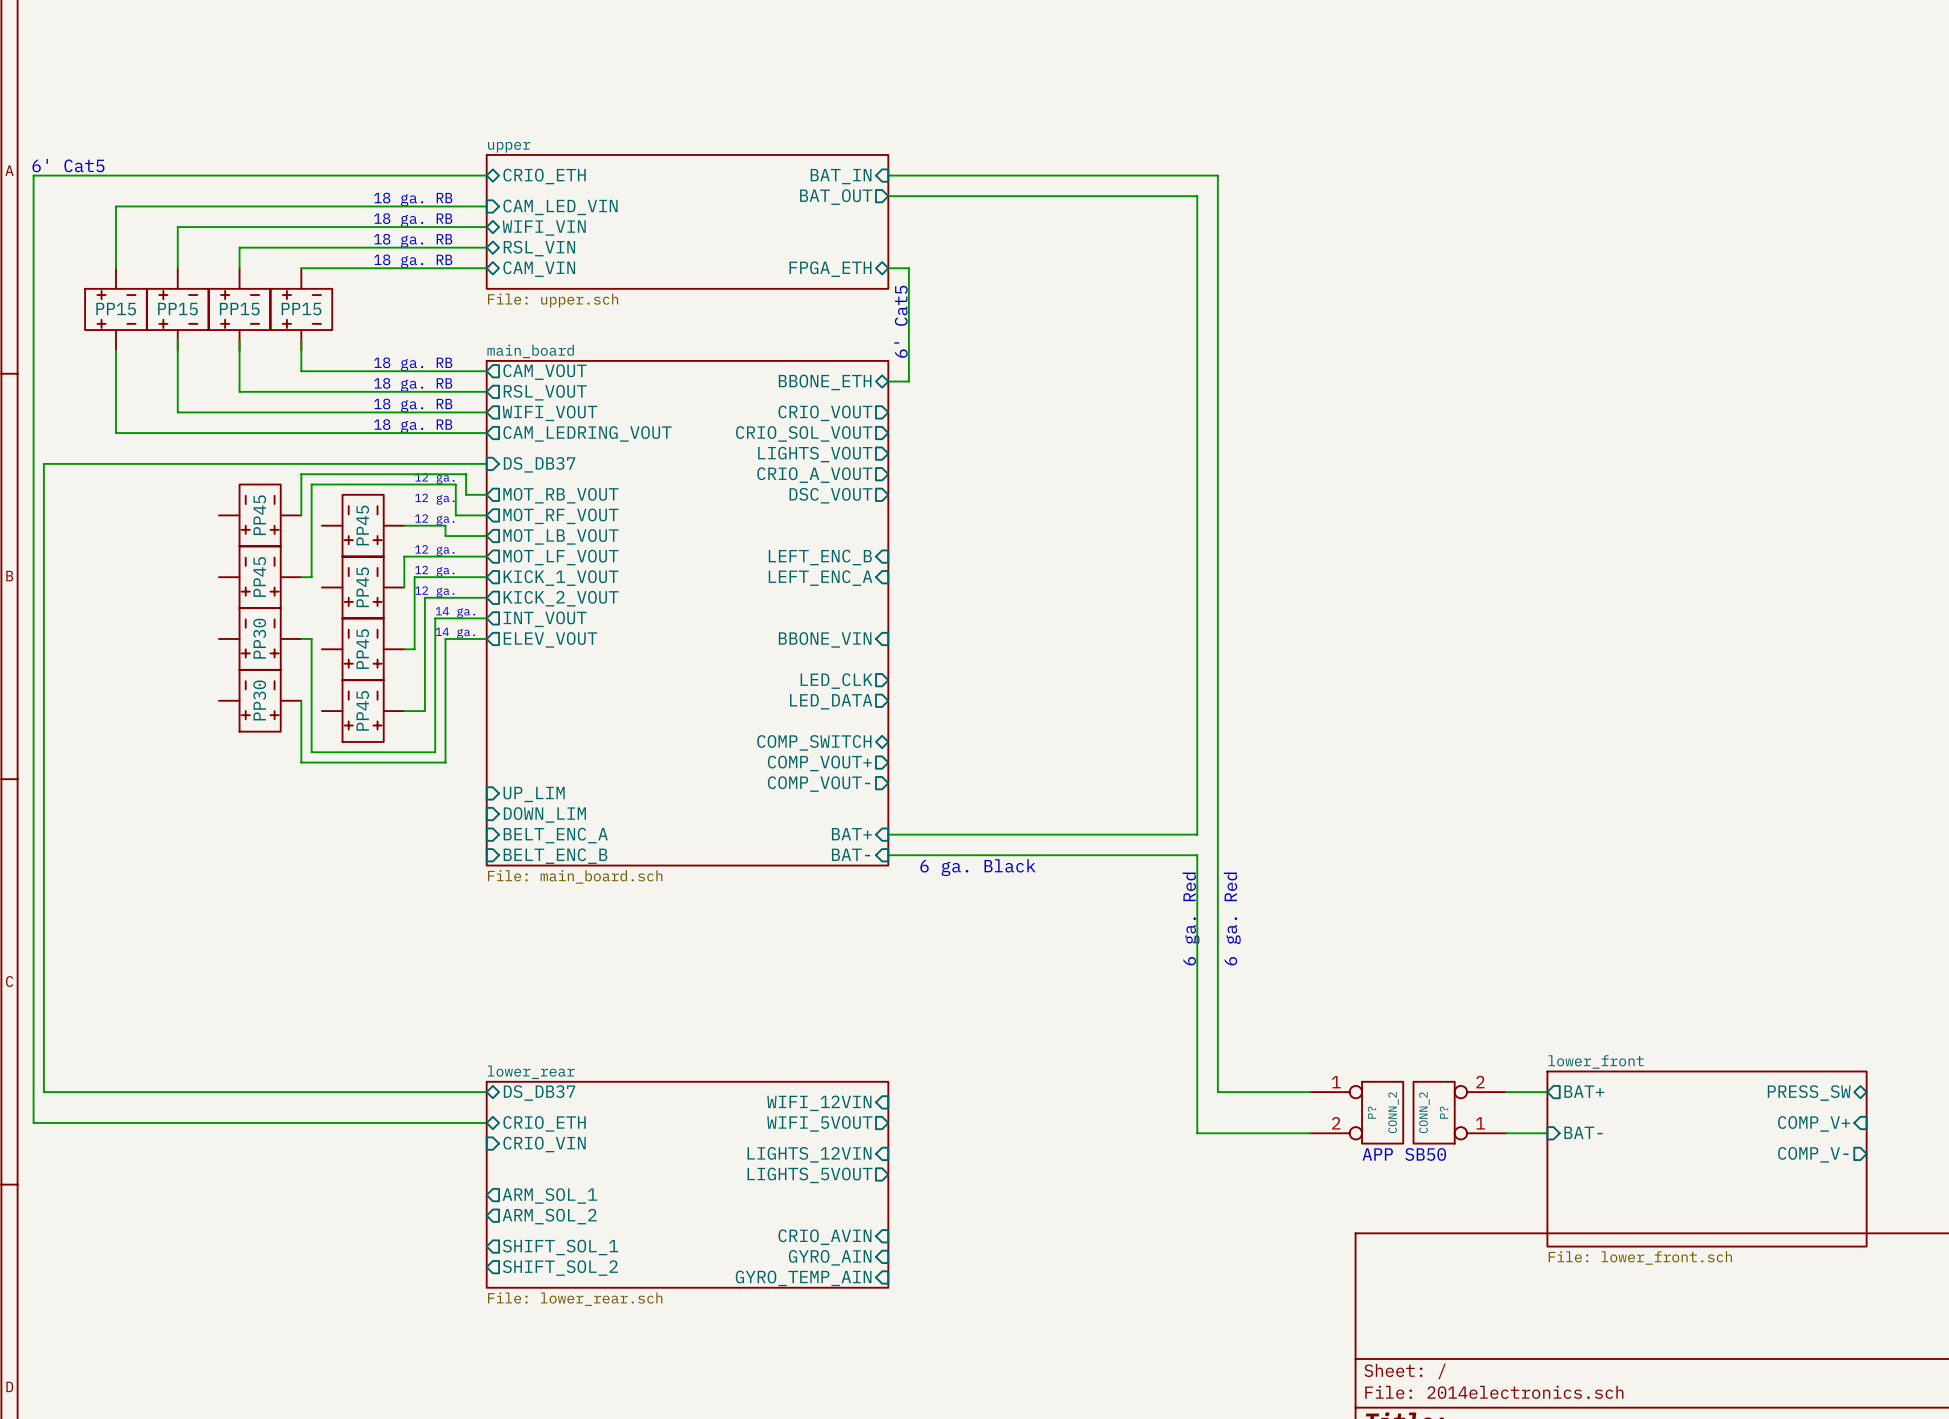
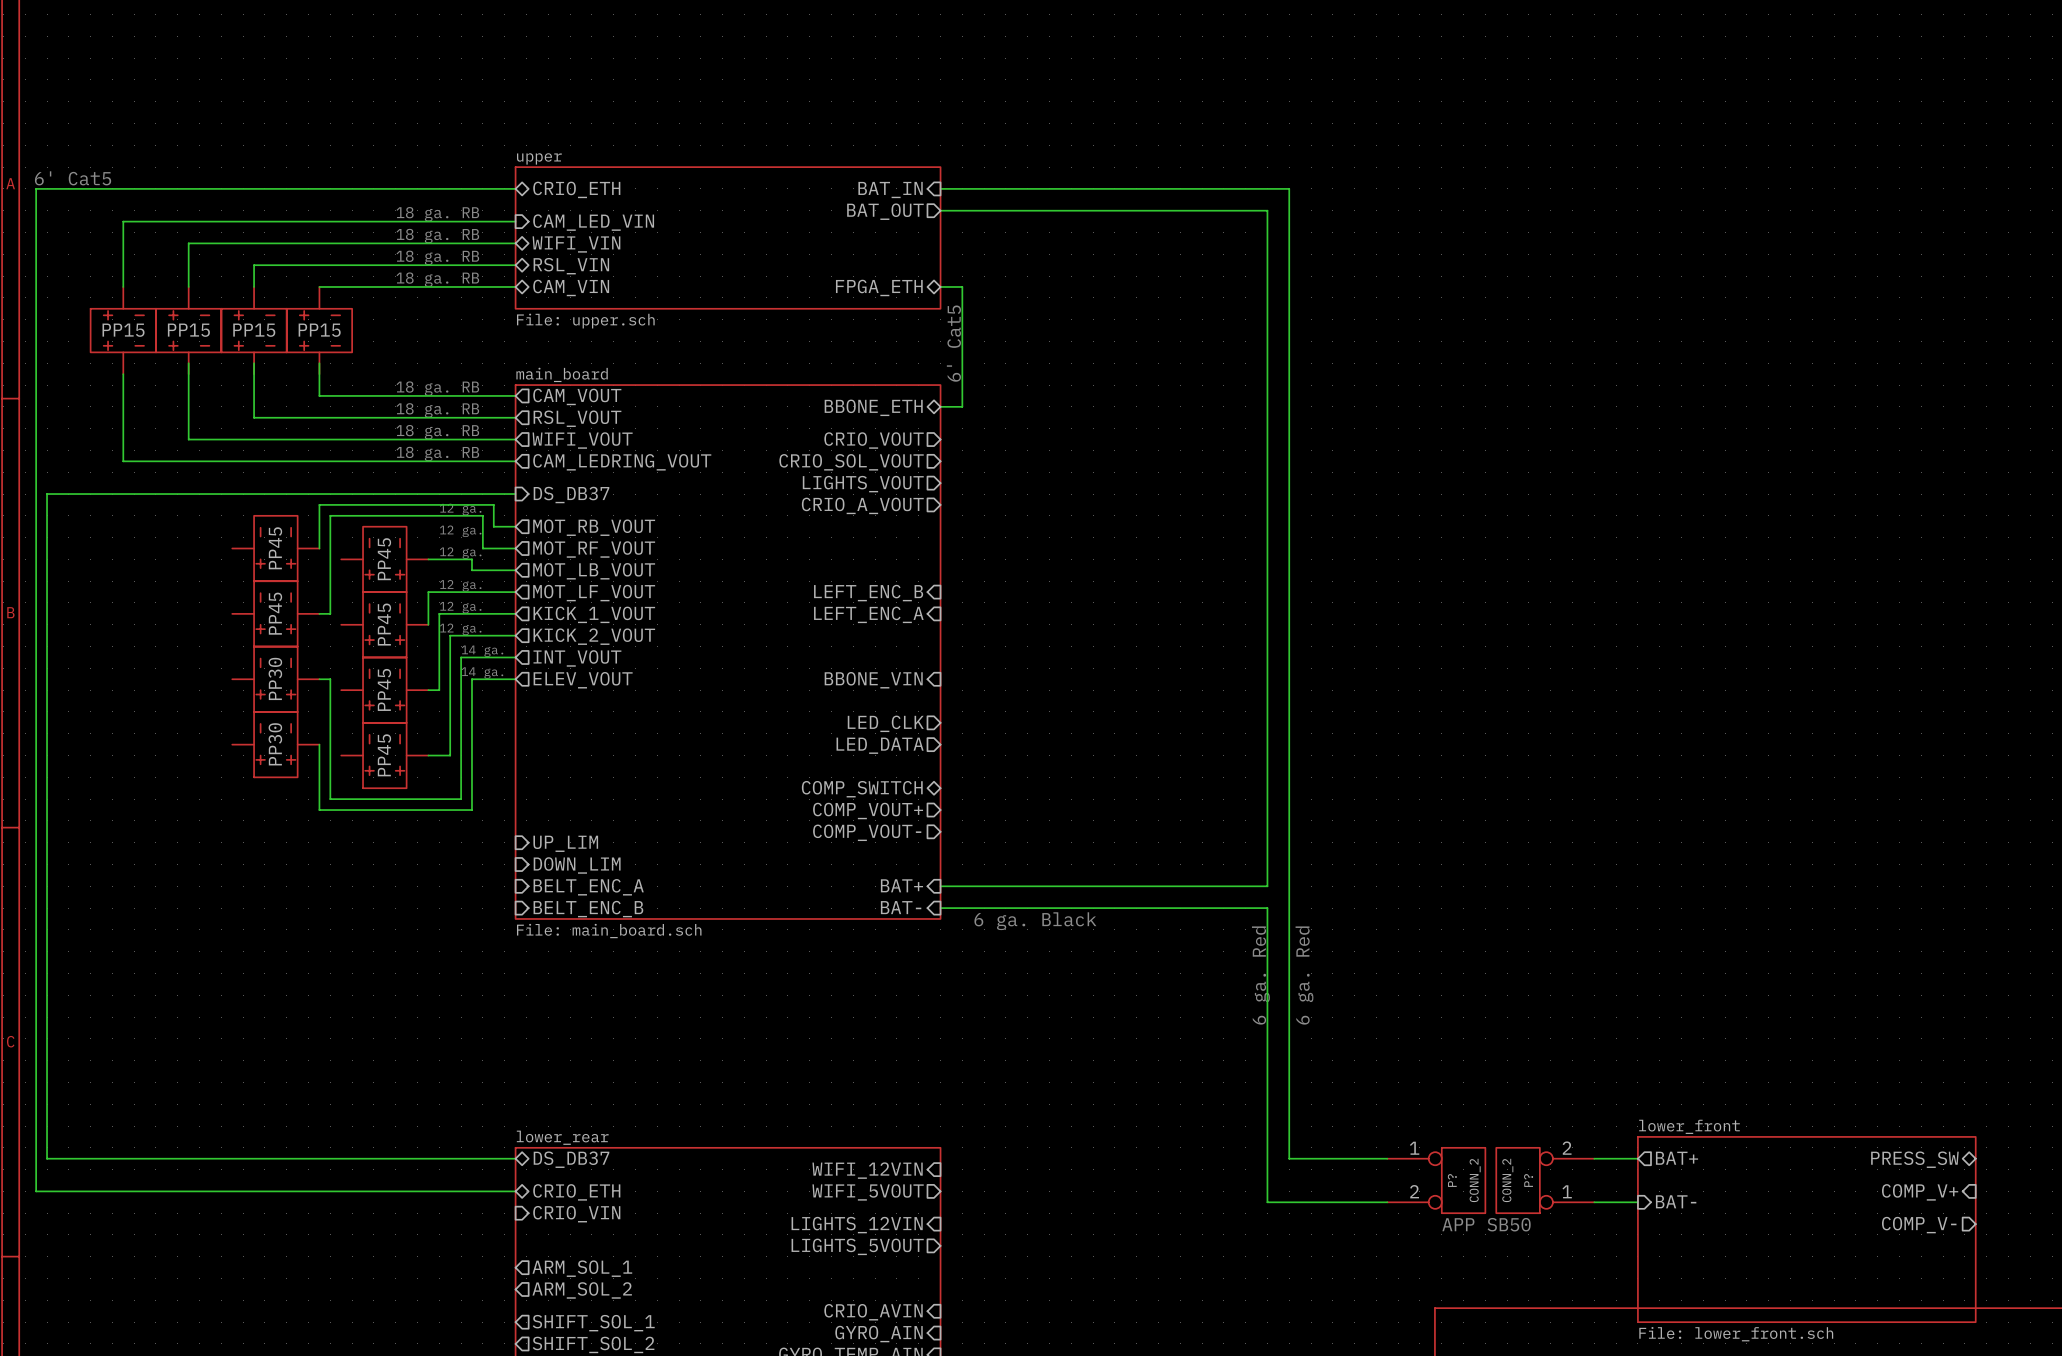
sheet pin: DSC_VOUT (831, 495) -> none

